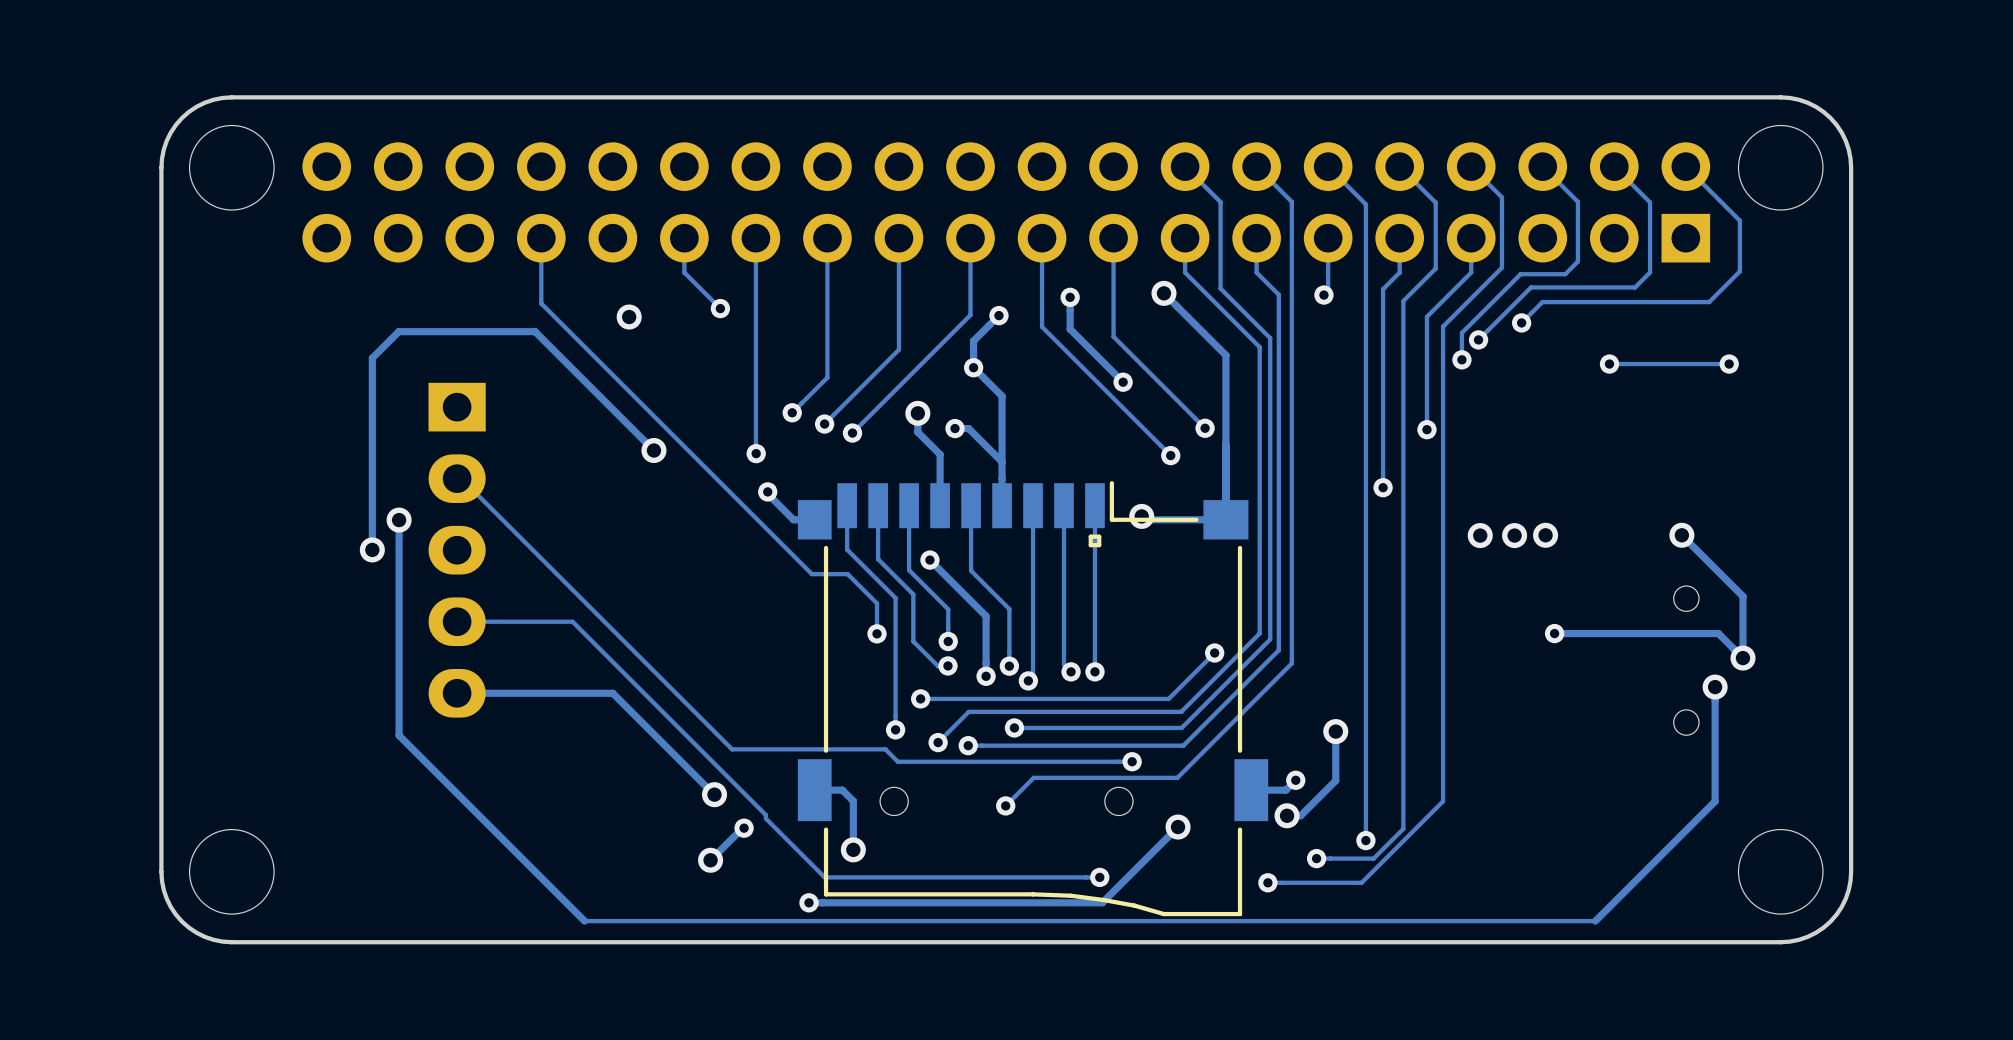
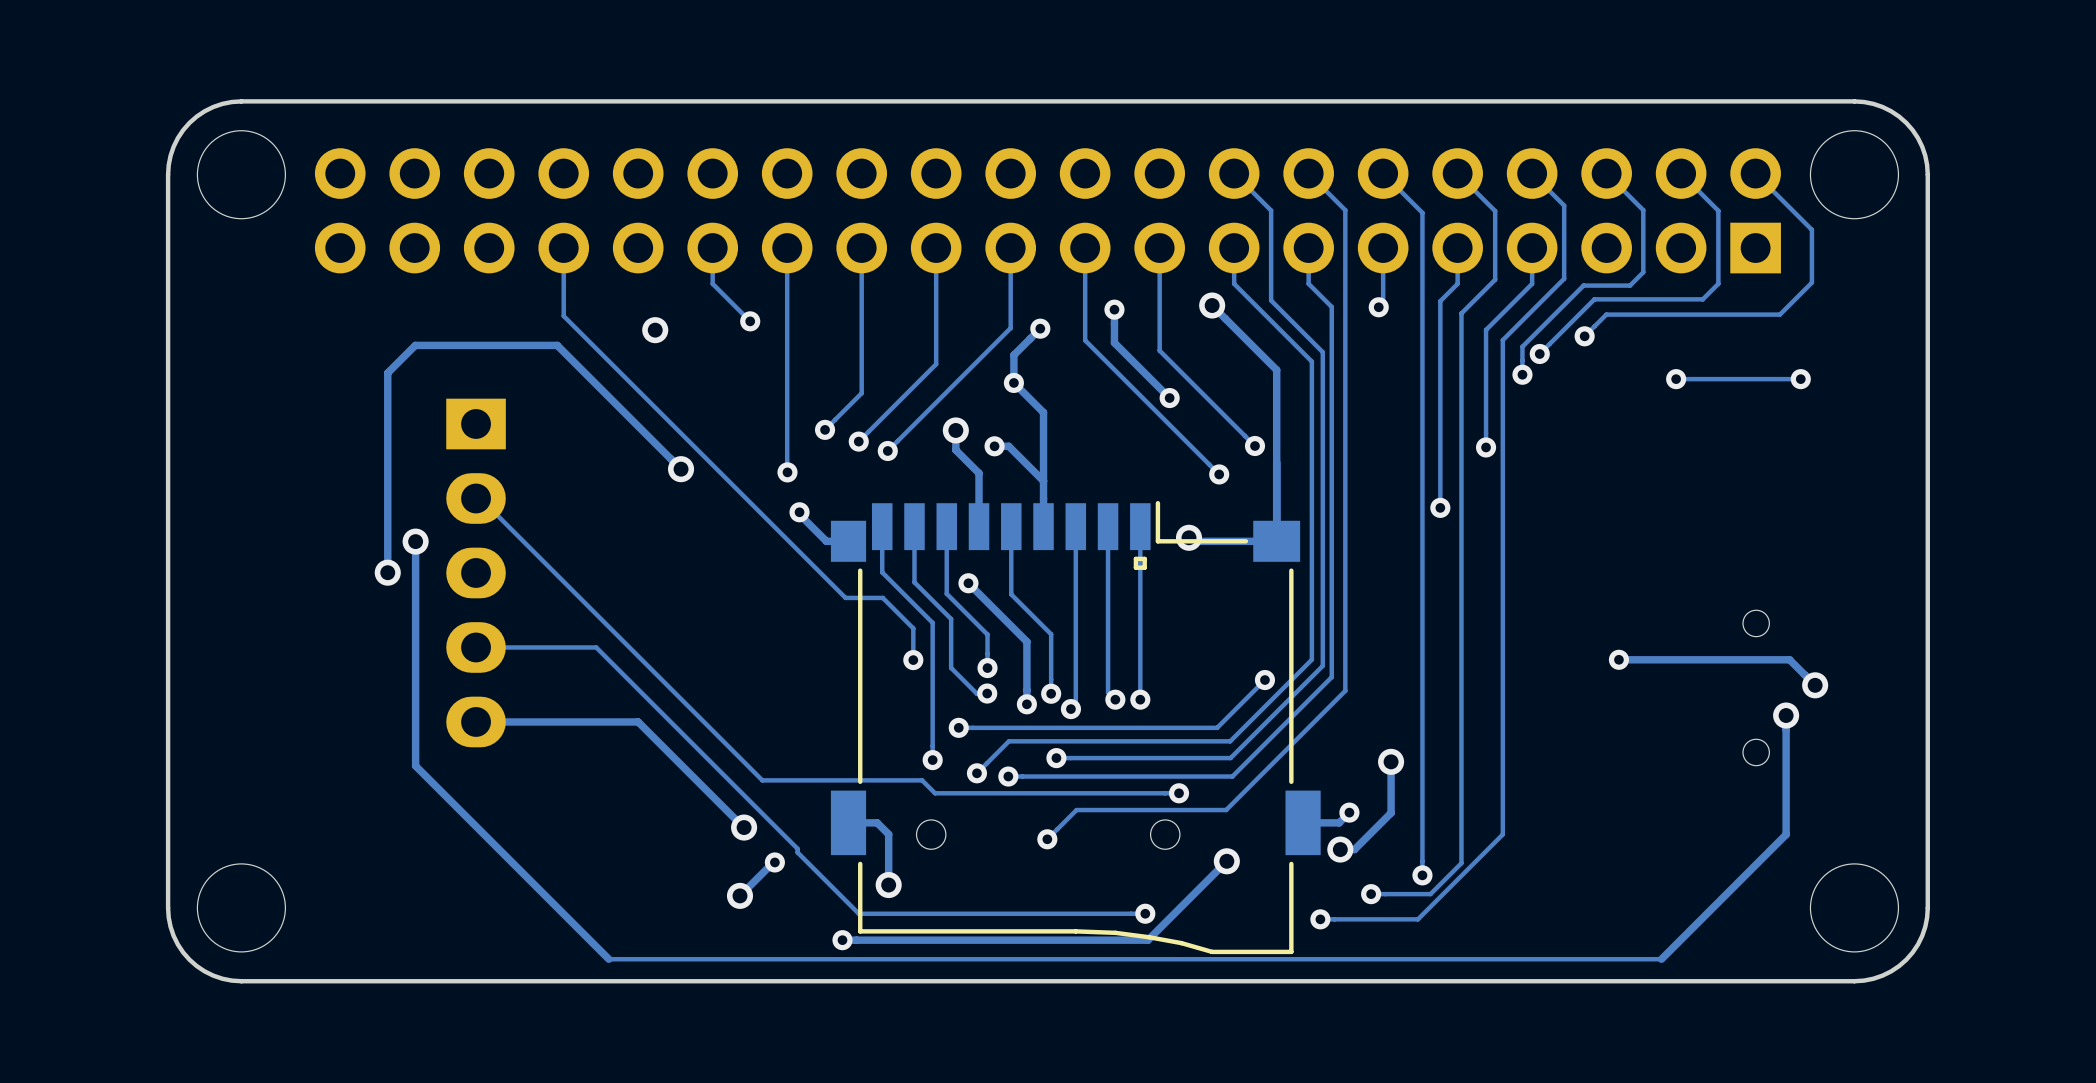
via: (1480, 535) -> none
via: (1514, 535) -> none
via: (1545, 535) -> none
track: (1681, 535) (1742, 596) (1742, 658) -> none
via: (1681, 535) -> none

